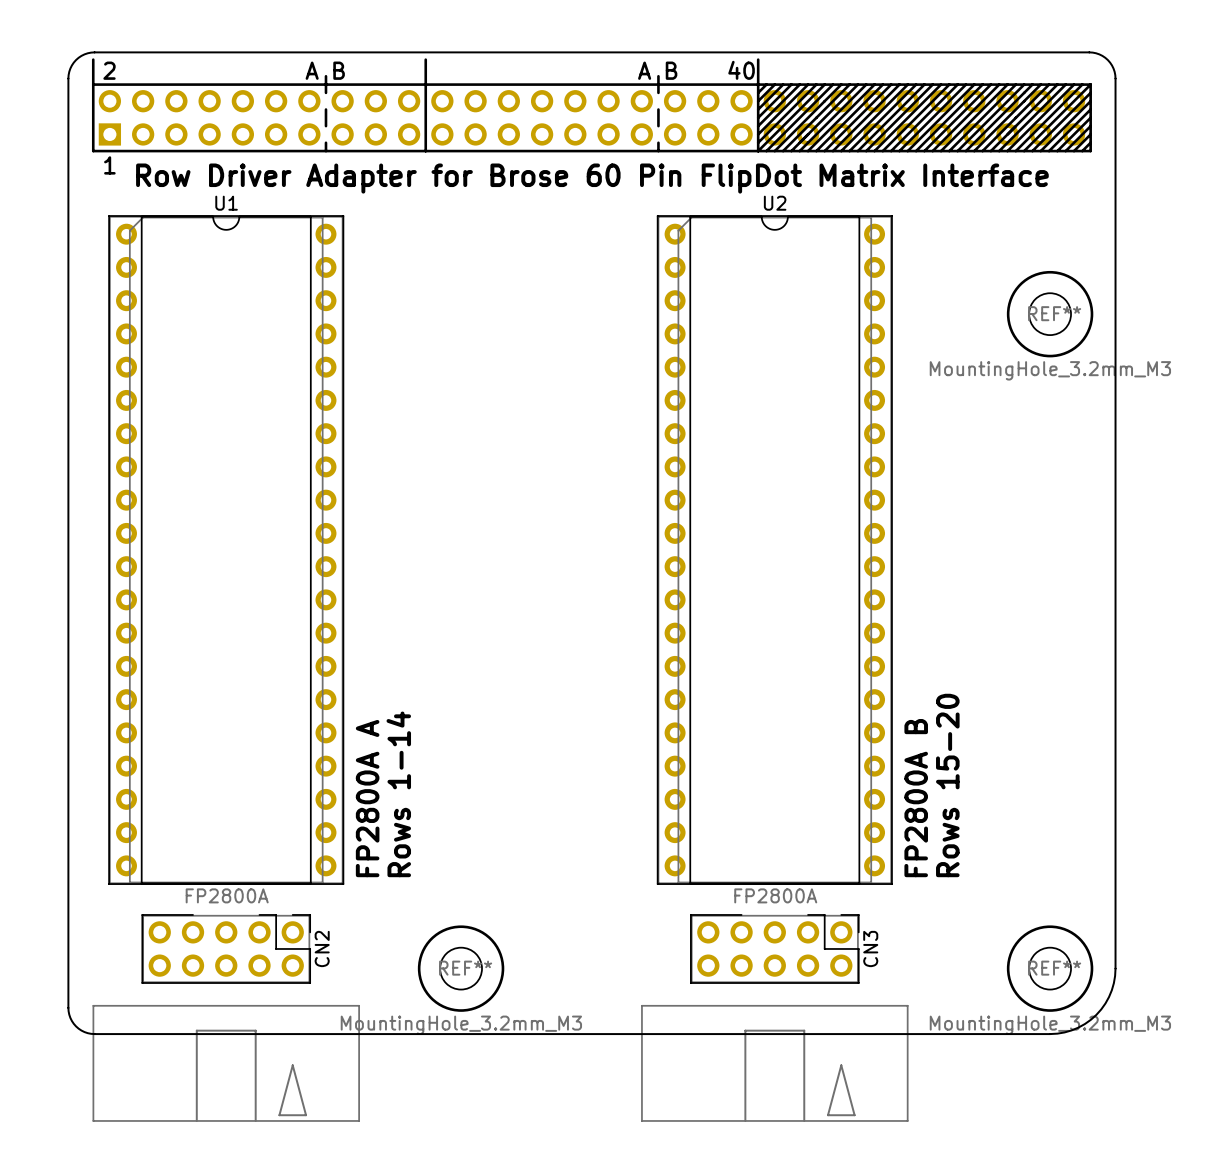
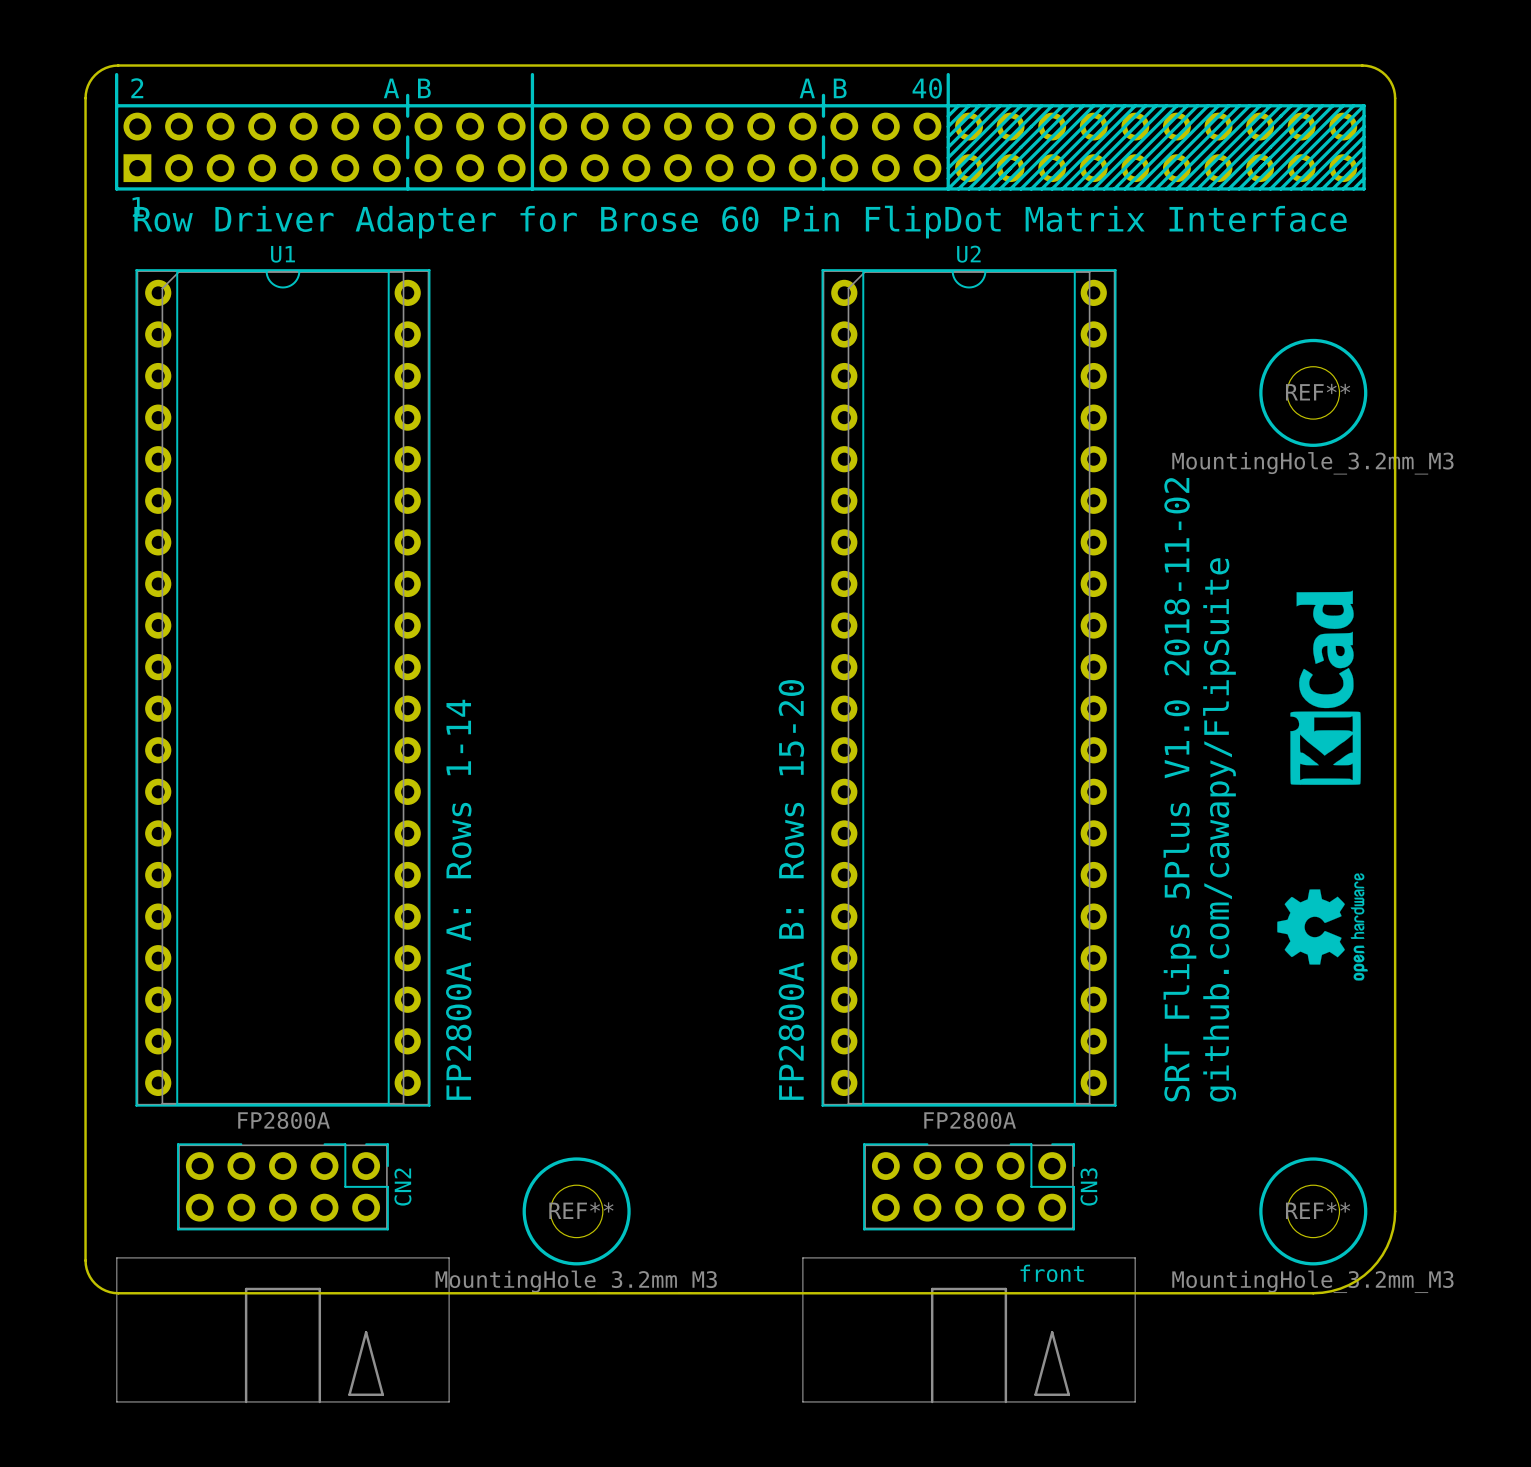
drawing: none -> [1290, 590, 1361, 785]
text: none -> github.com/cawapy/FlipSuite (1219, 829)
text: none -> FP2800A B: Rows 15-20 (791, 889)
drawing: none -> [1277, 873, 1368, 981]
text: Rows 15-20 (947, 785) -> SRT Flips 5Plus V1.0 2018-11-02 (1179, 789)
text: Rows 1-14 (398, 794) -> none
text: FP2800A A (367, 798) -> FP2800A A: Rows 1-14 (458, 899)
text: FP2800A B (916, 798) -> none
text: none -> front (1052, 1273)

